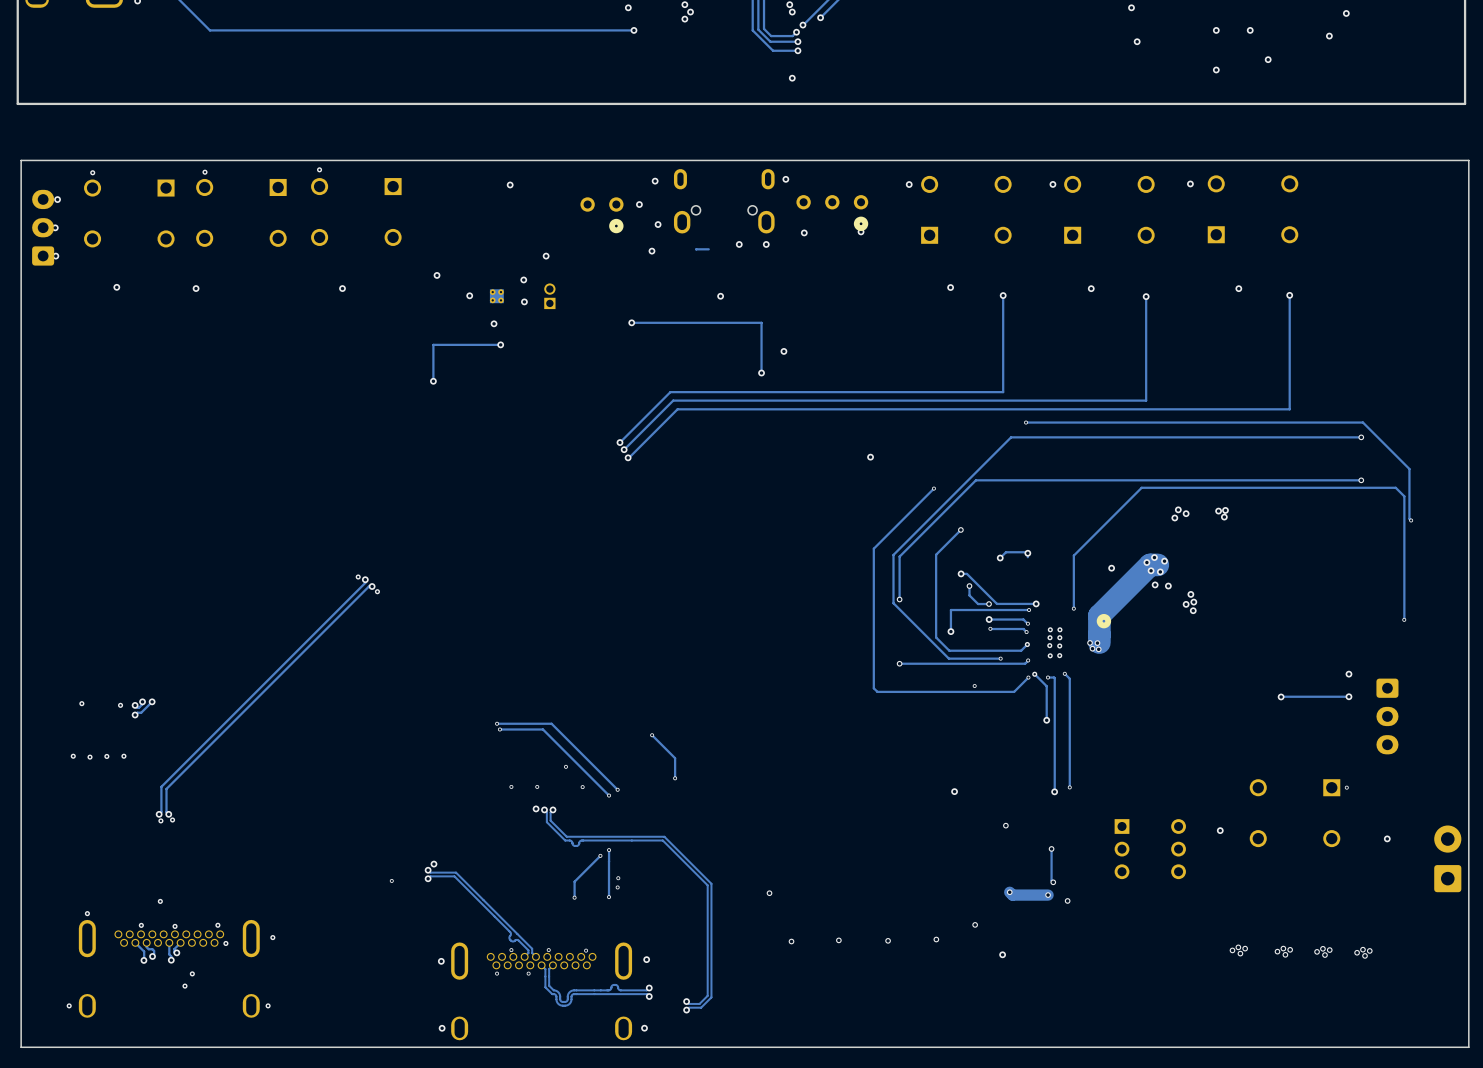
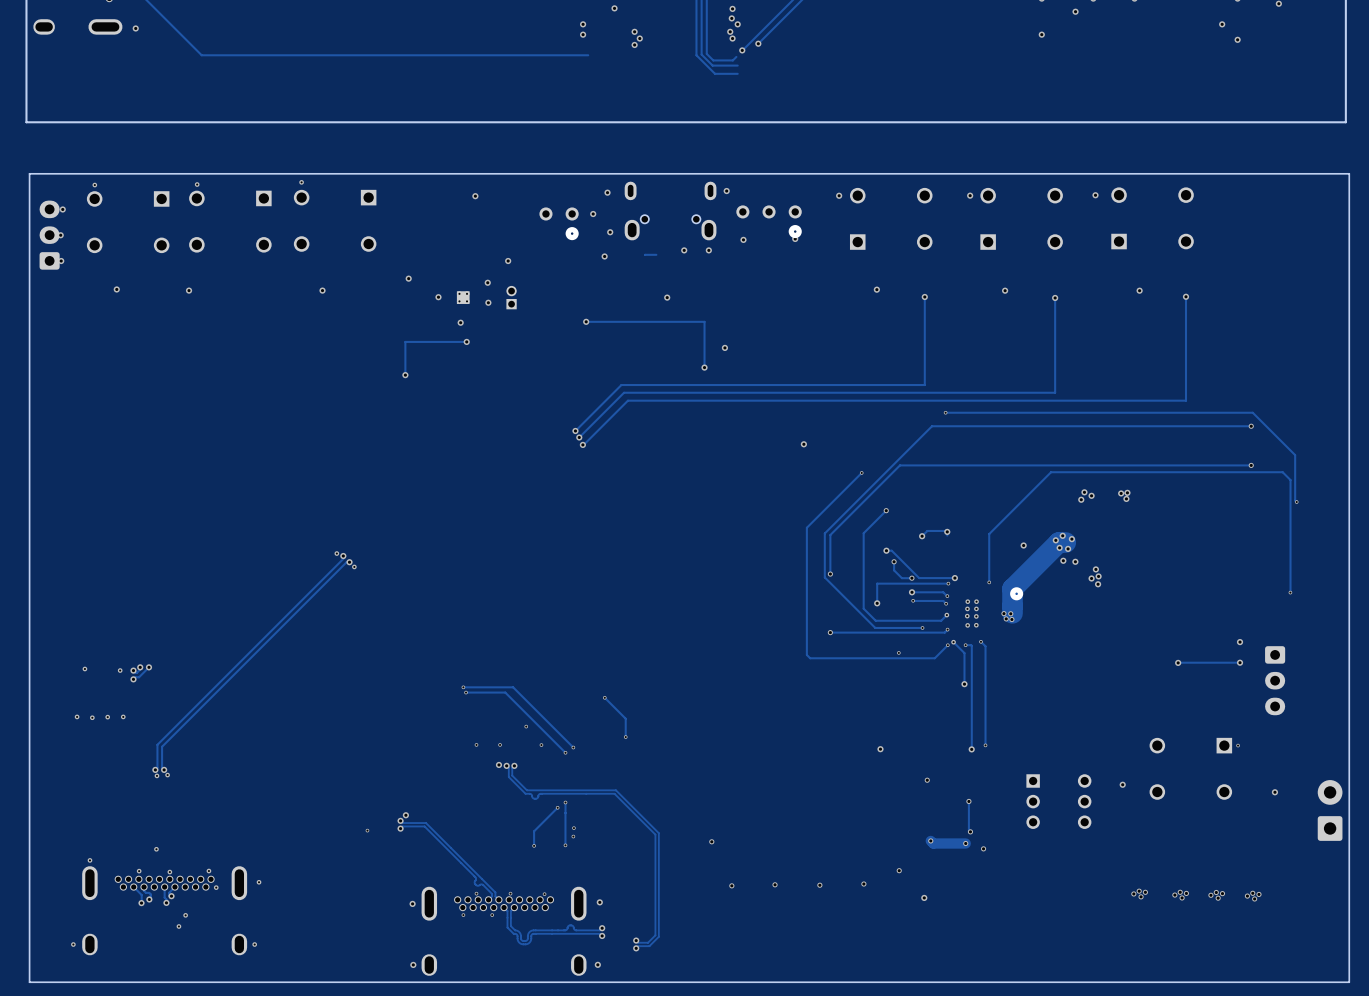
via: (633, 30) -> none
via: (1216, 30) -> none
via: (1250, 30) -> none
via: (796, 32) -> none
via: (1329, 36) -> none
via: (797, 41) -> none
via: (1137, 41) -> none
via: (797, 50) -> none
via: (1268, 59) -> none
via: (1216, 69) -> none
via: (792, 78) -> none

